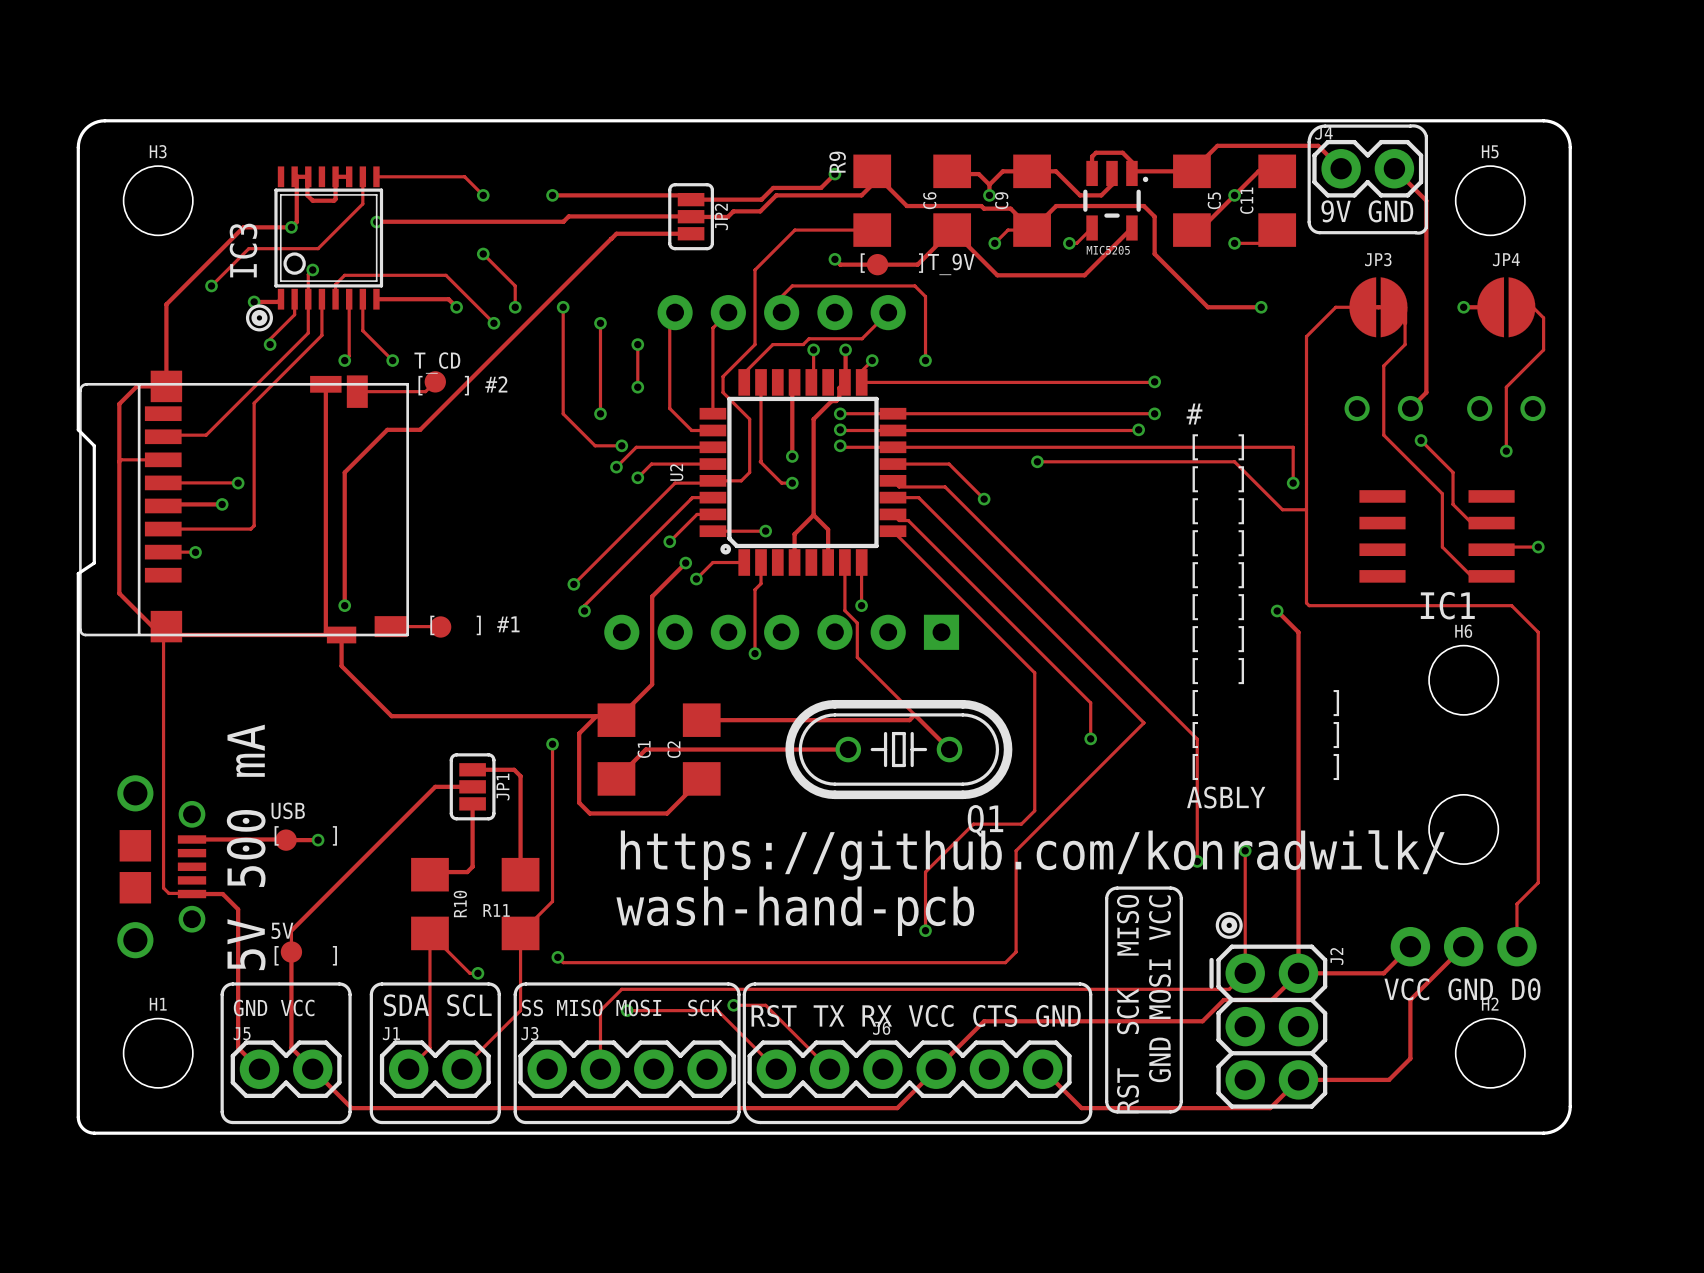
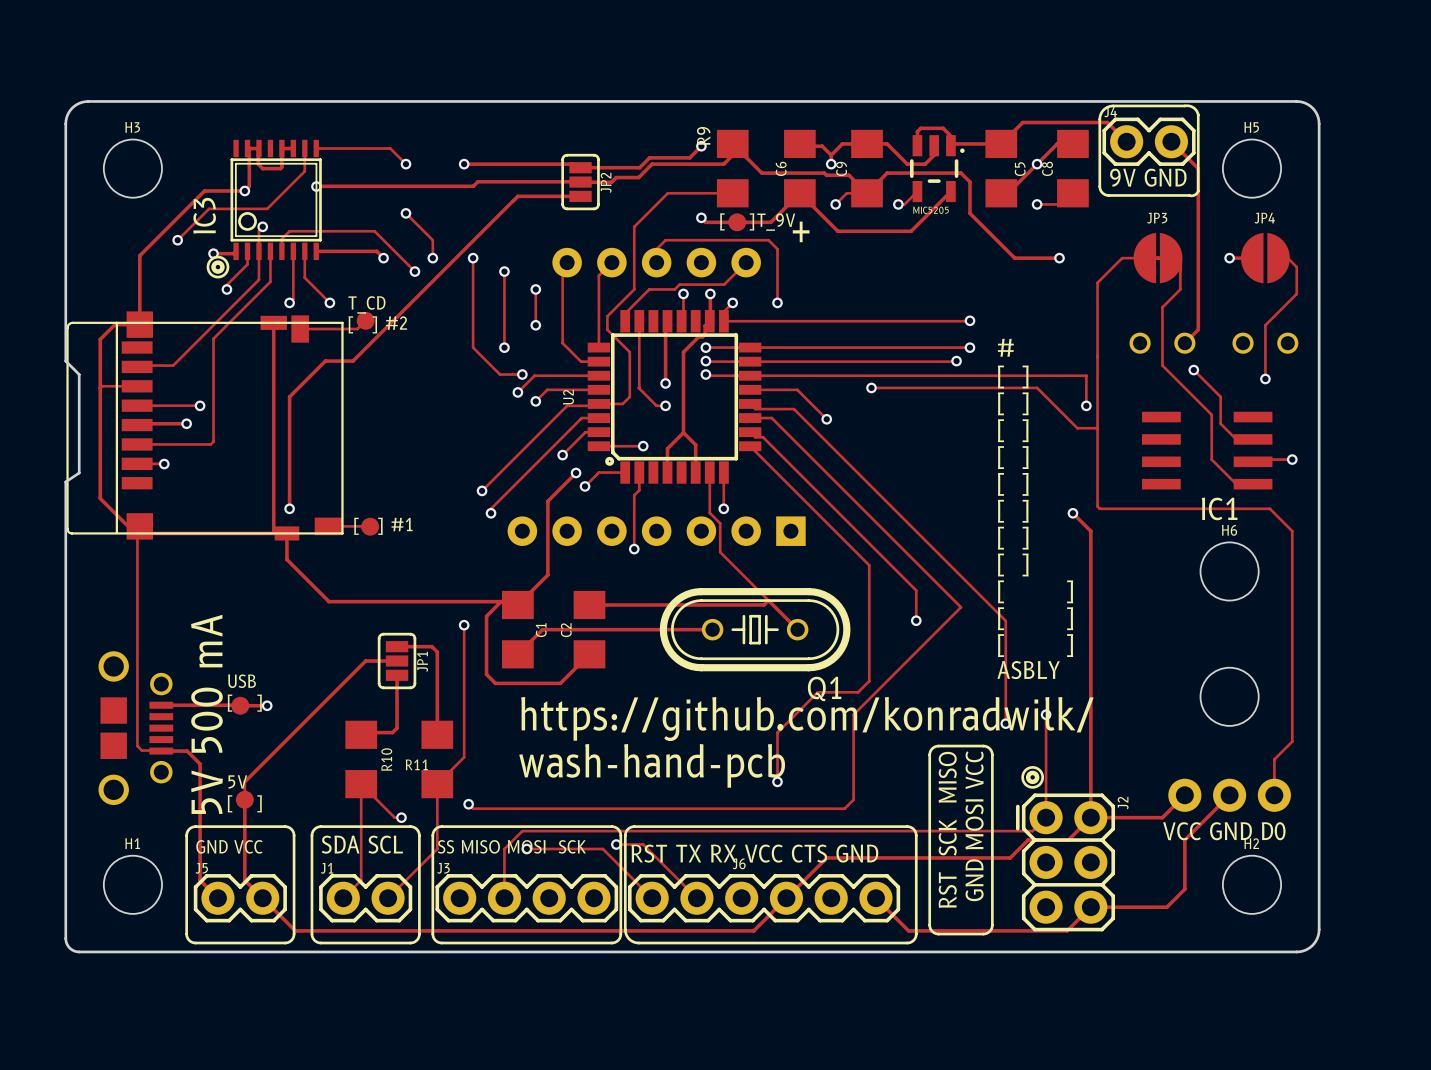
C11 name: C11 (1246, 200) -> C8 (1047, 168)
text: none -> + (801, 231)

